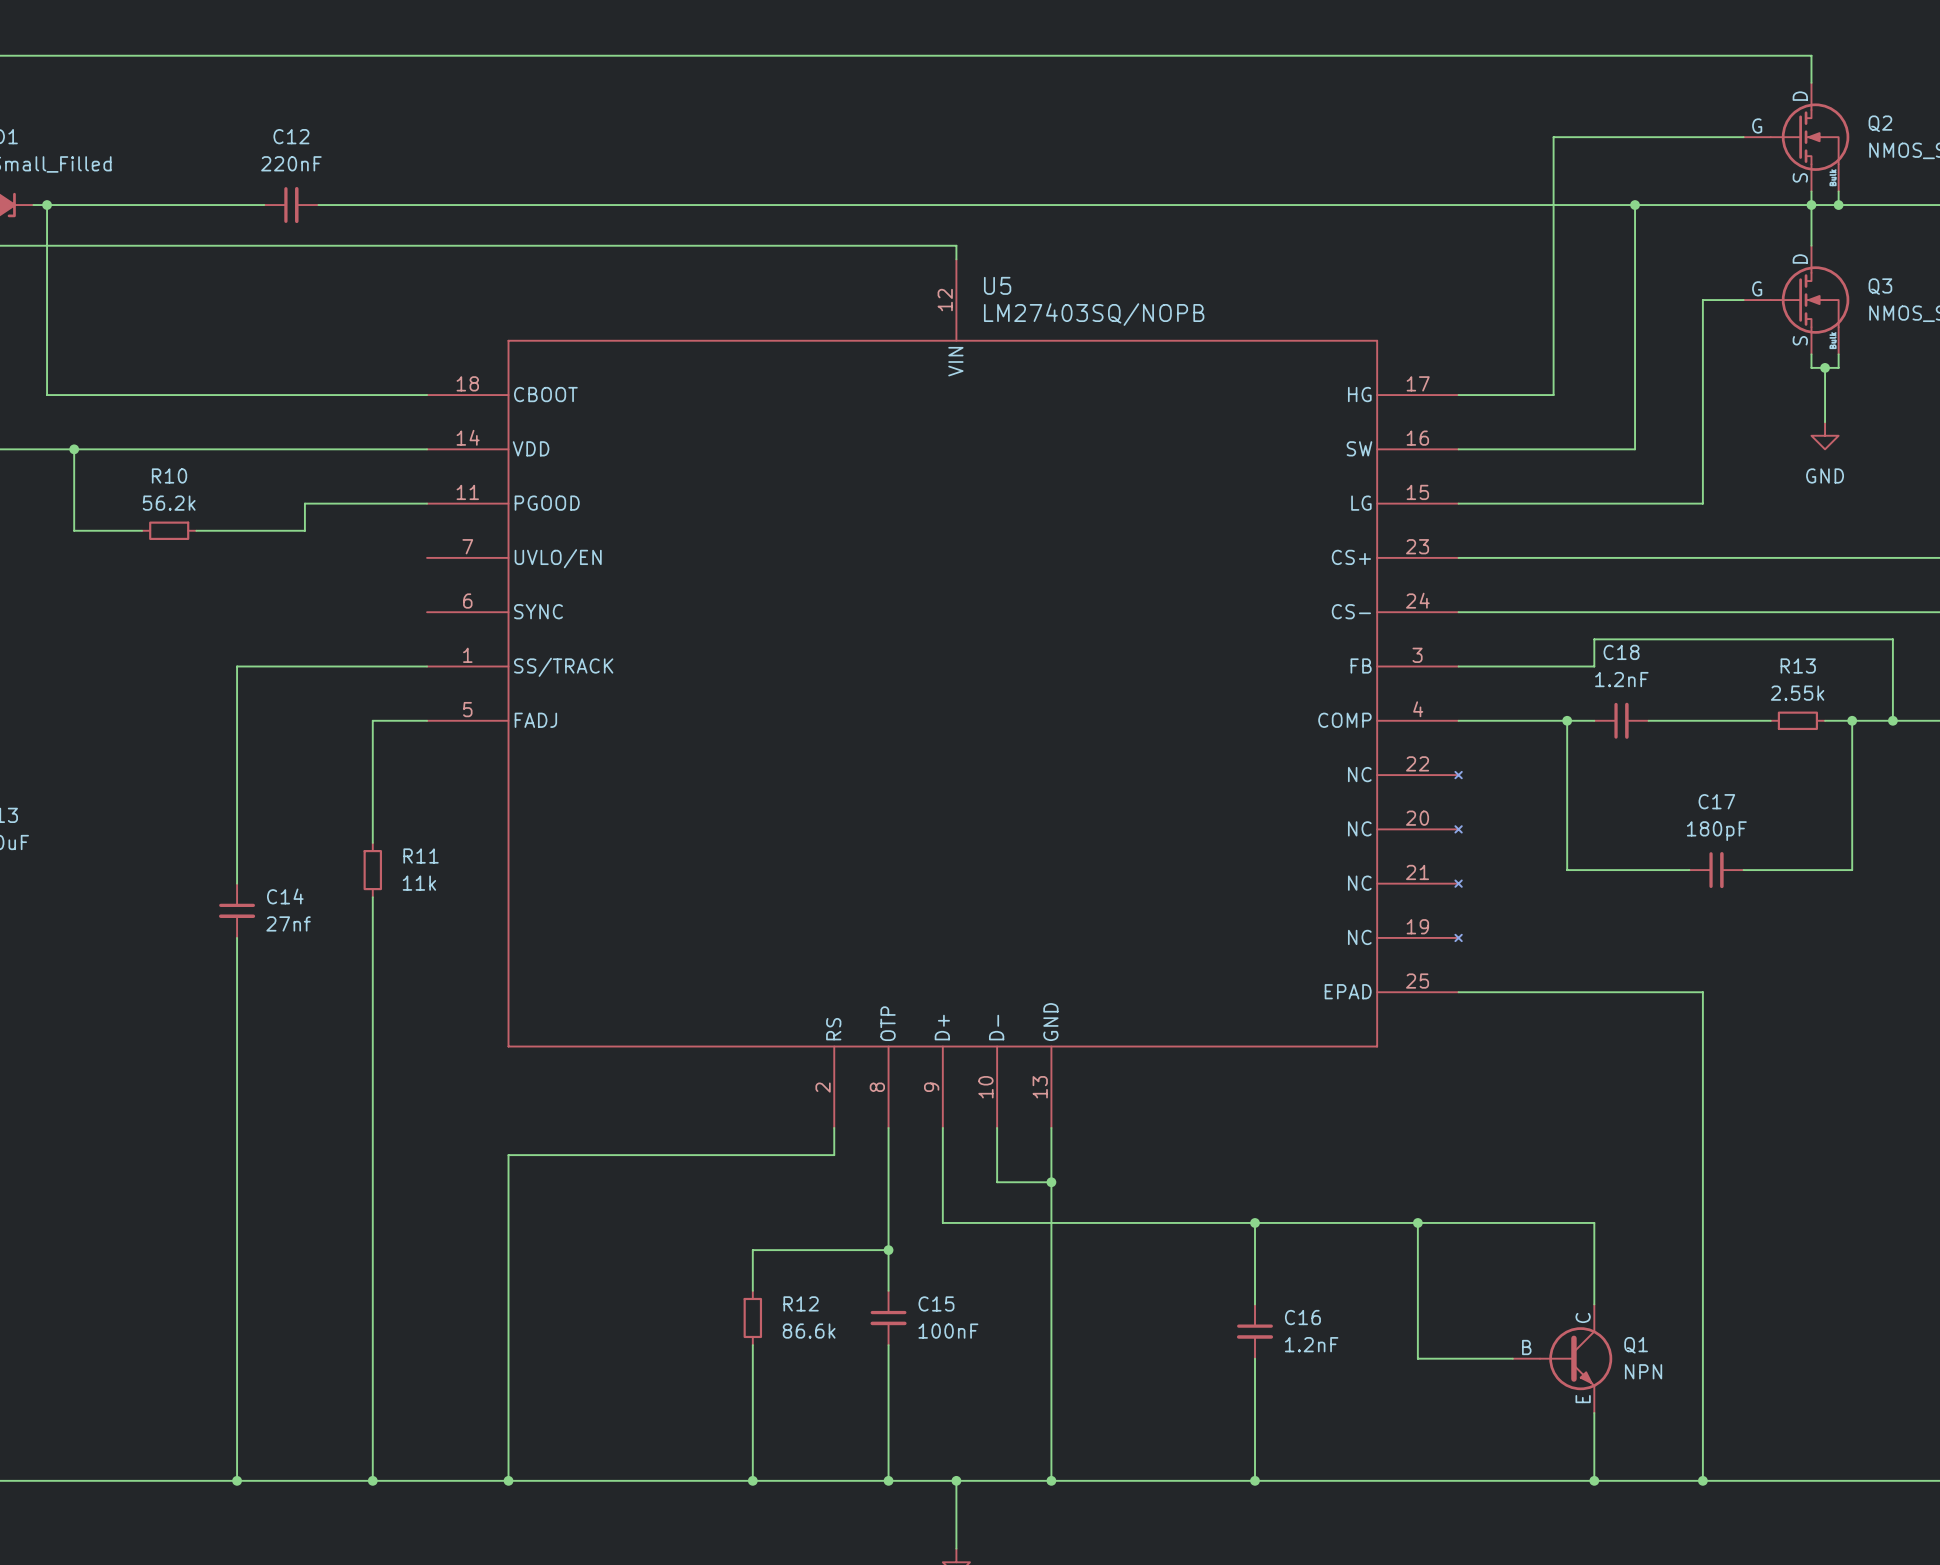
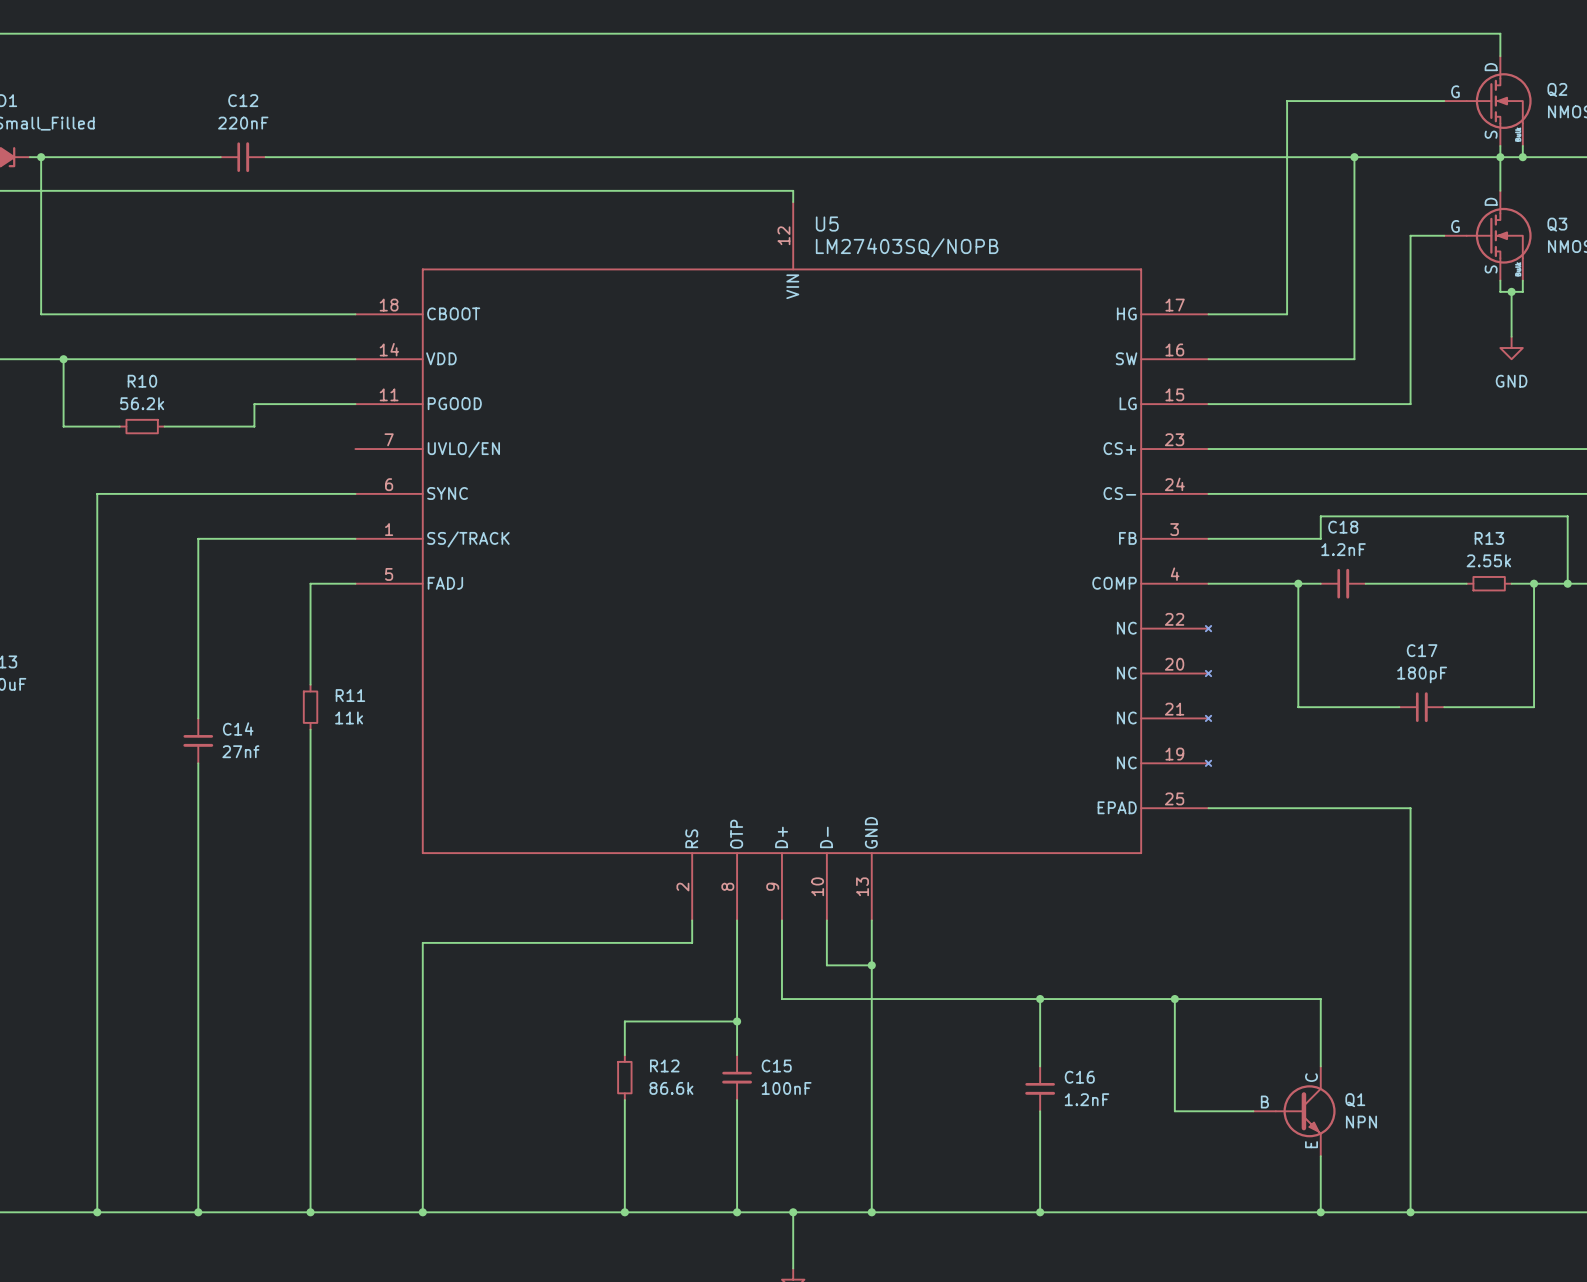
wire: none -> (355, 493) (97, 493) (97, 1212)
junction: none -> (97, 1212)

